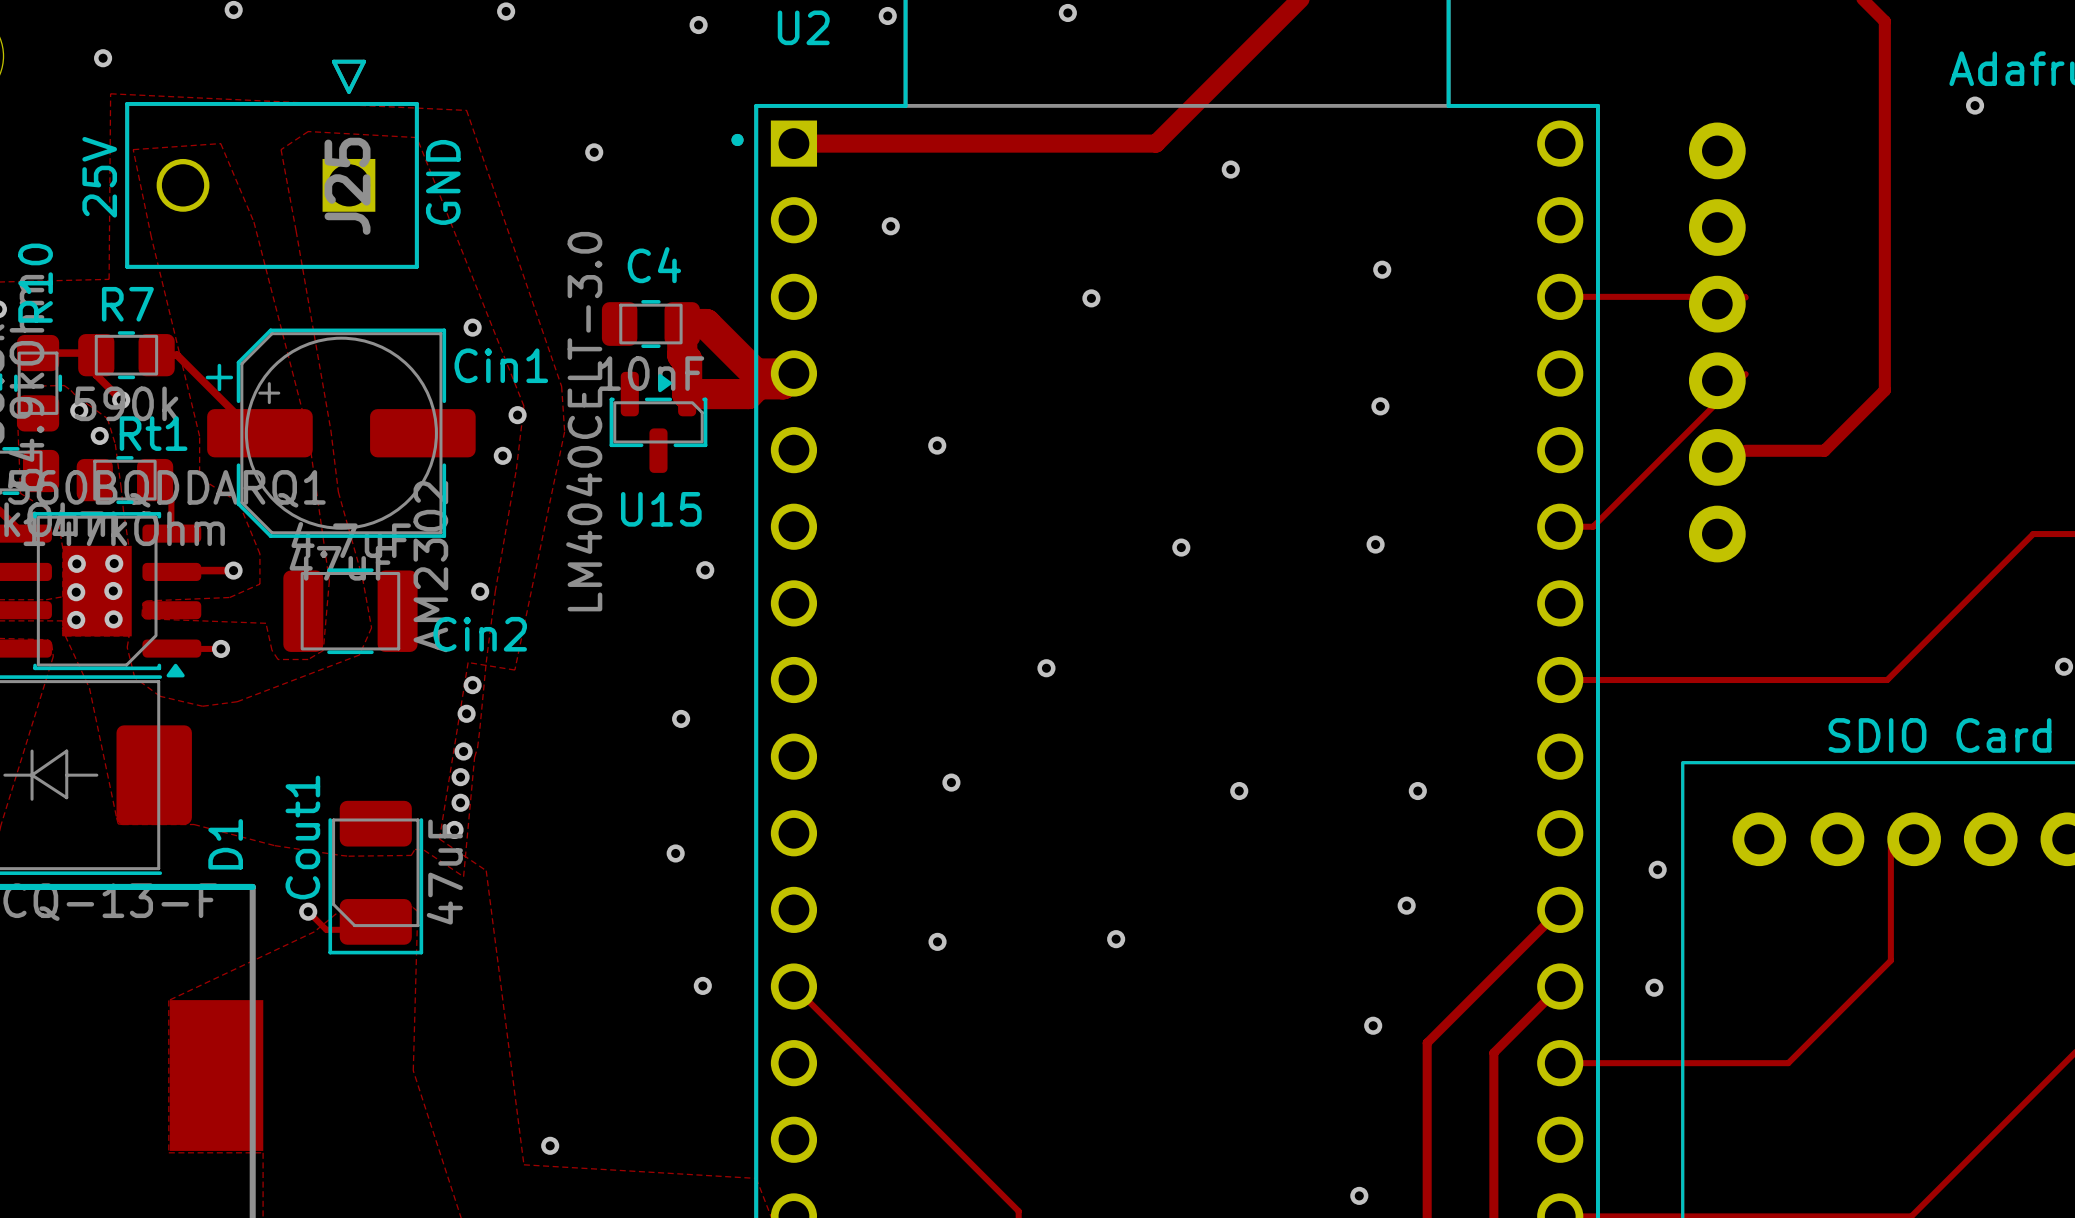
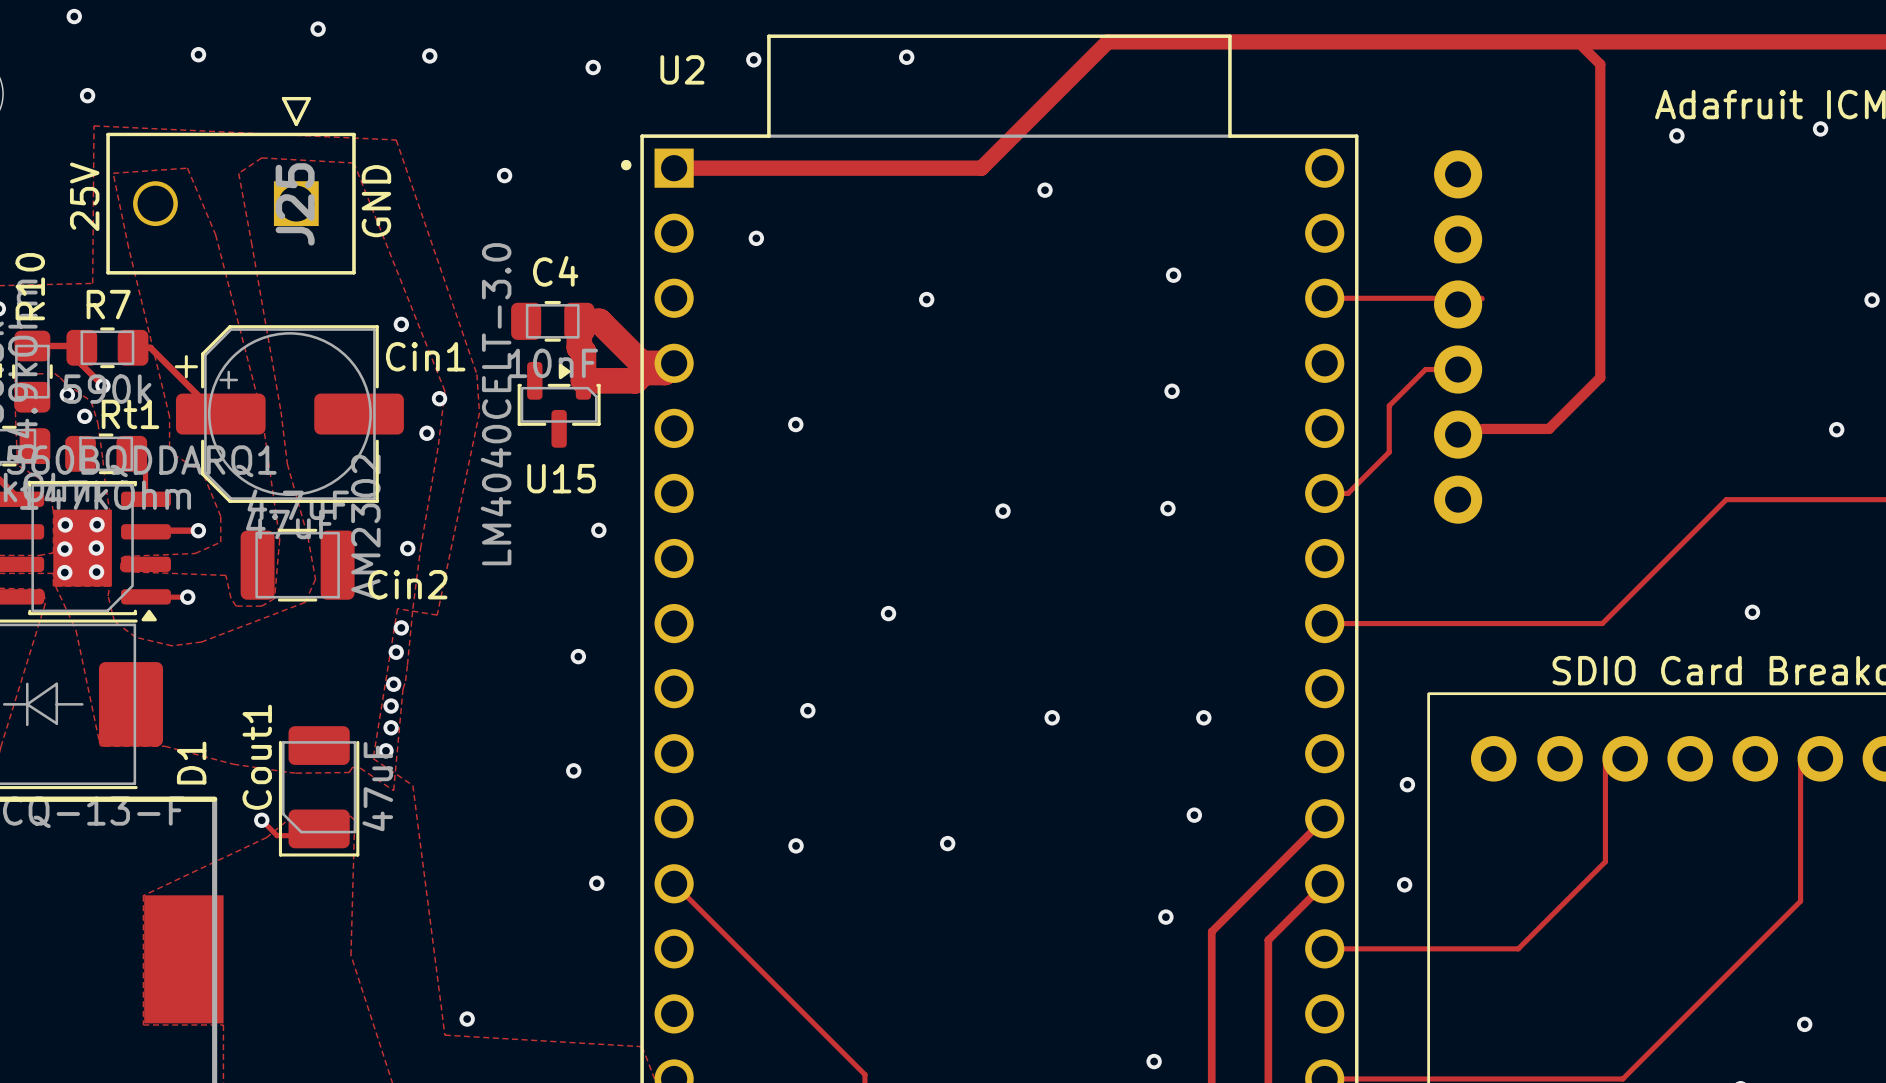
track: (1745, 374) (1593, 526) (1587, 526) -> (1458, 369) (1425, 369) (1389, 405) (1389, 452) (1348, 493)

